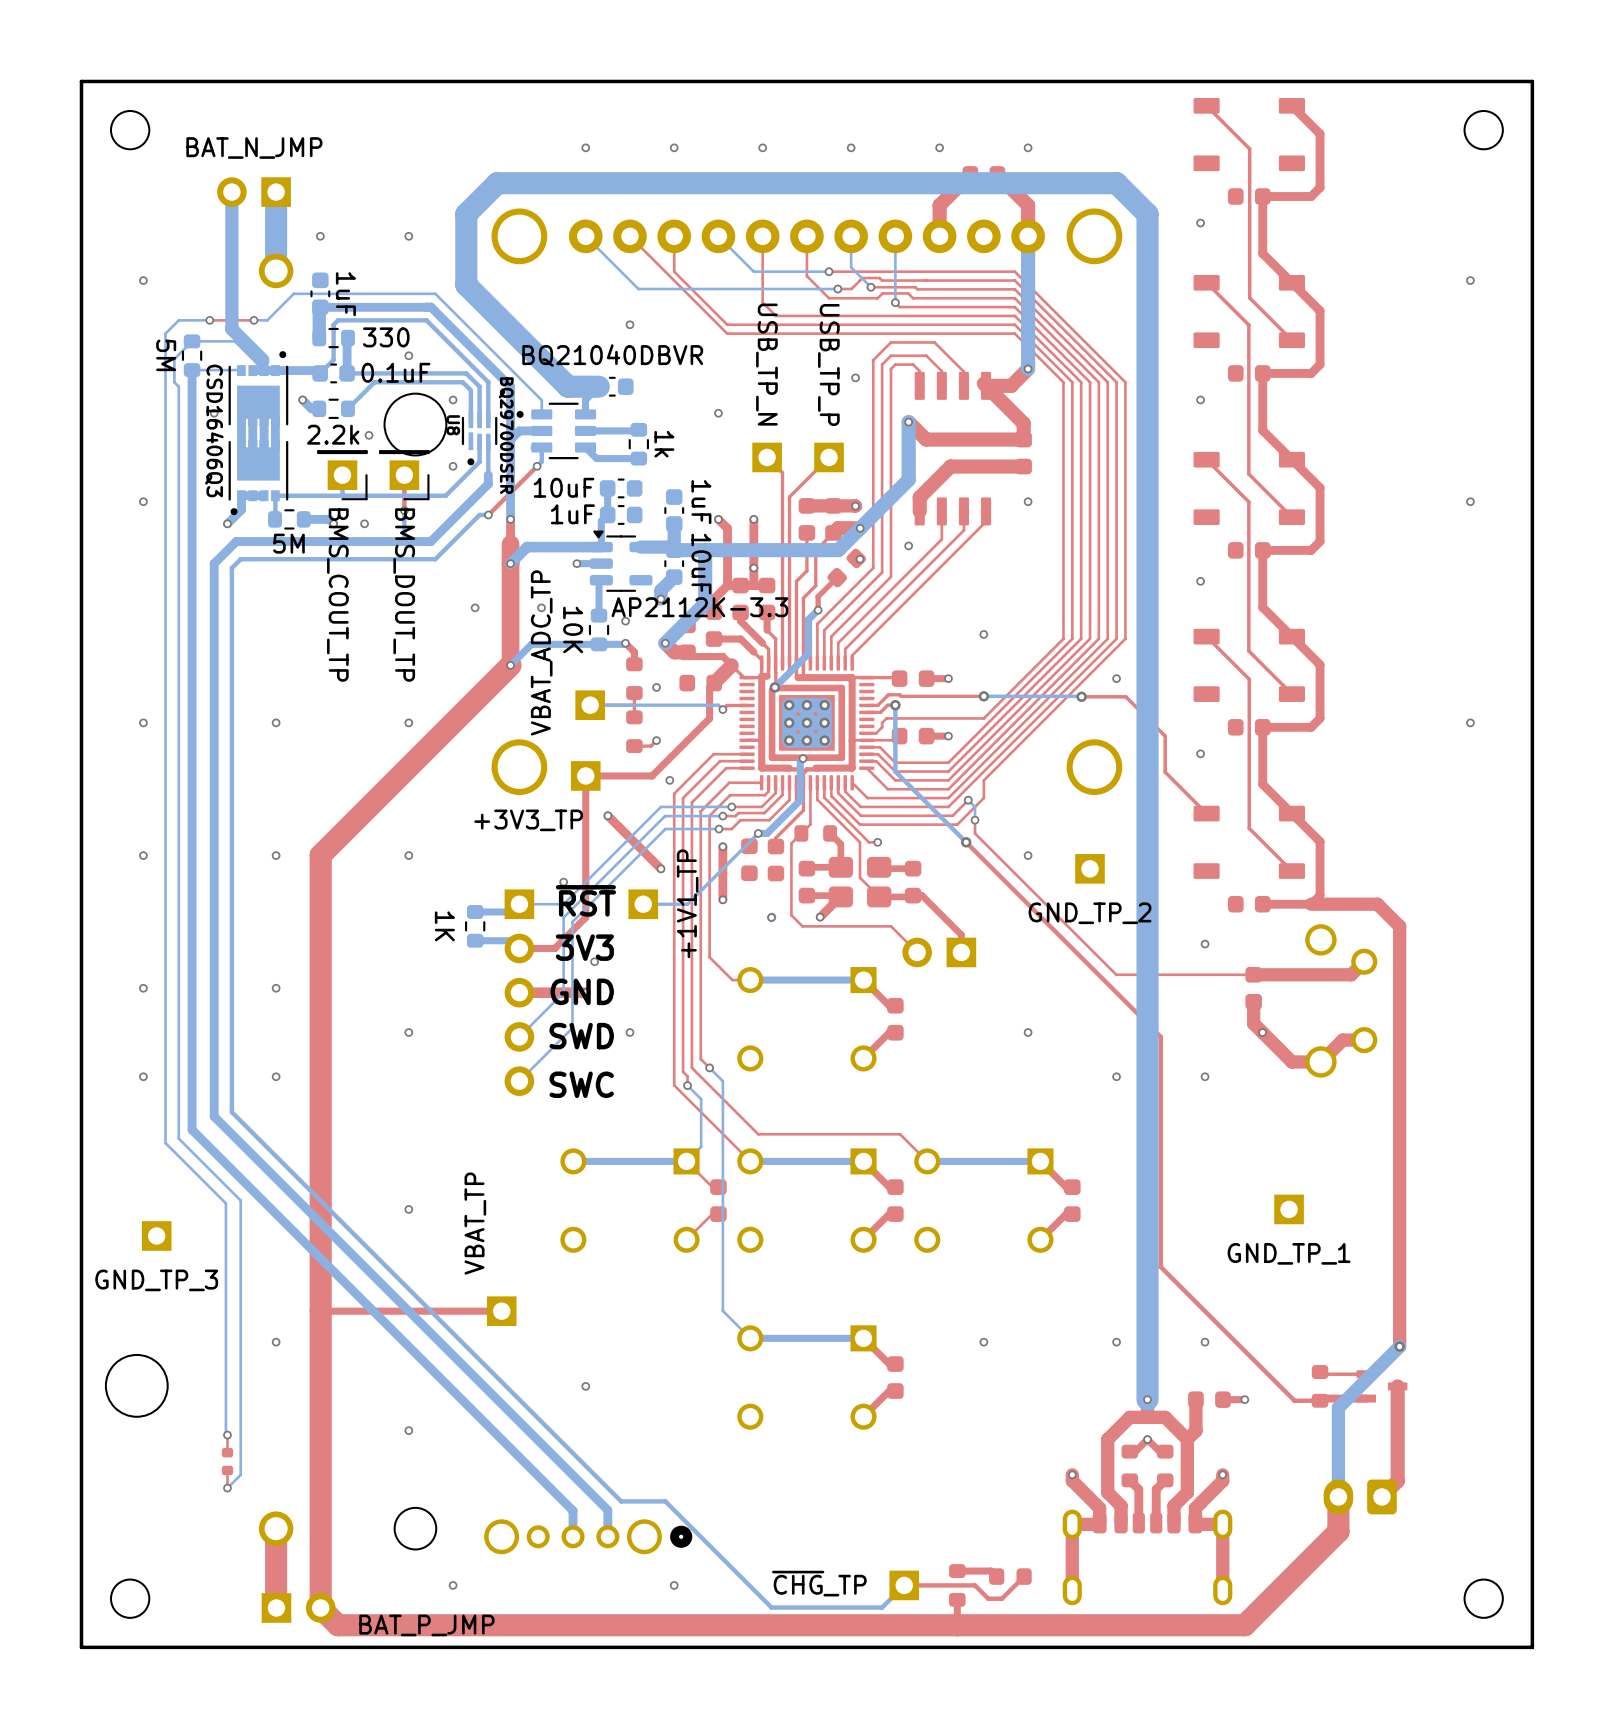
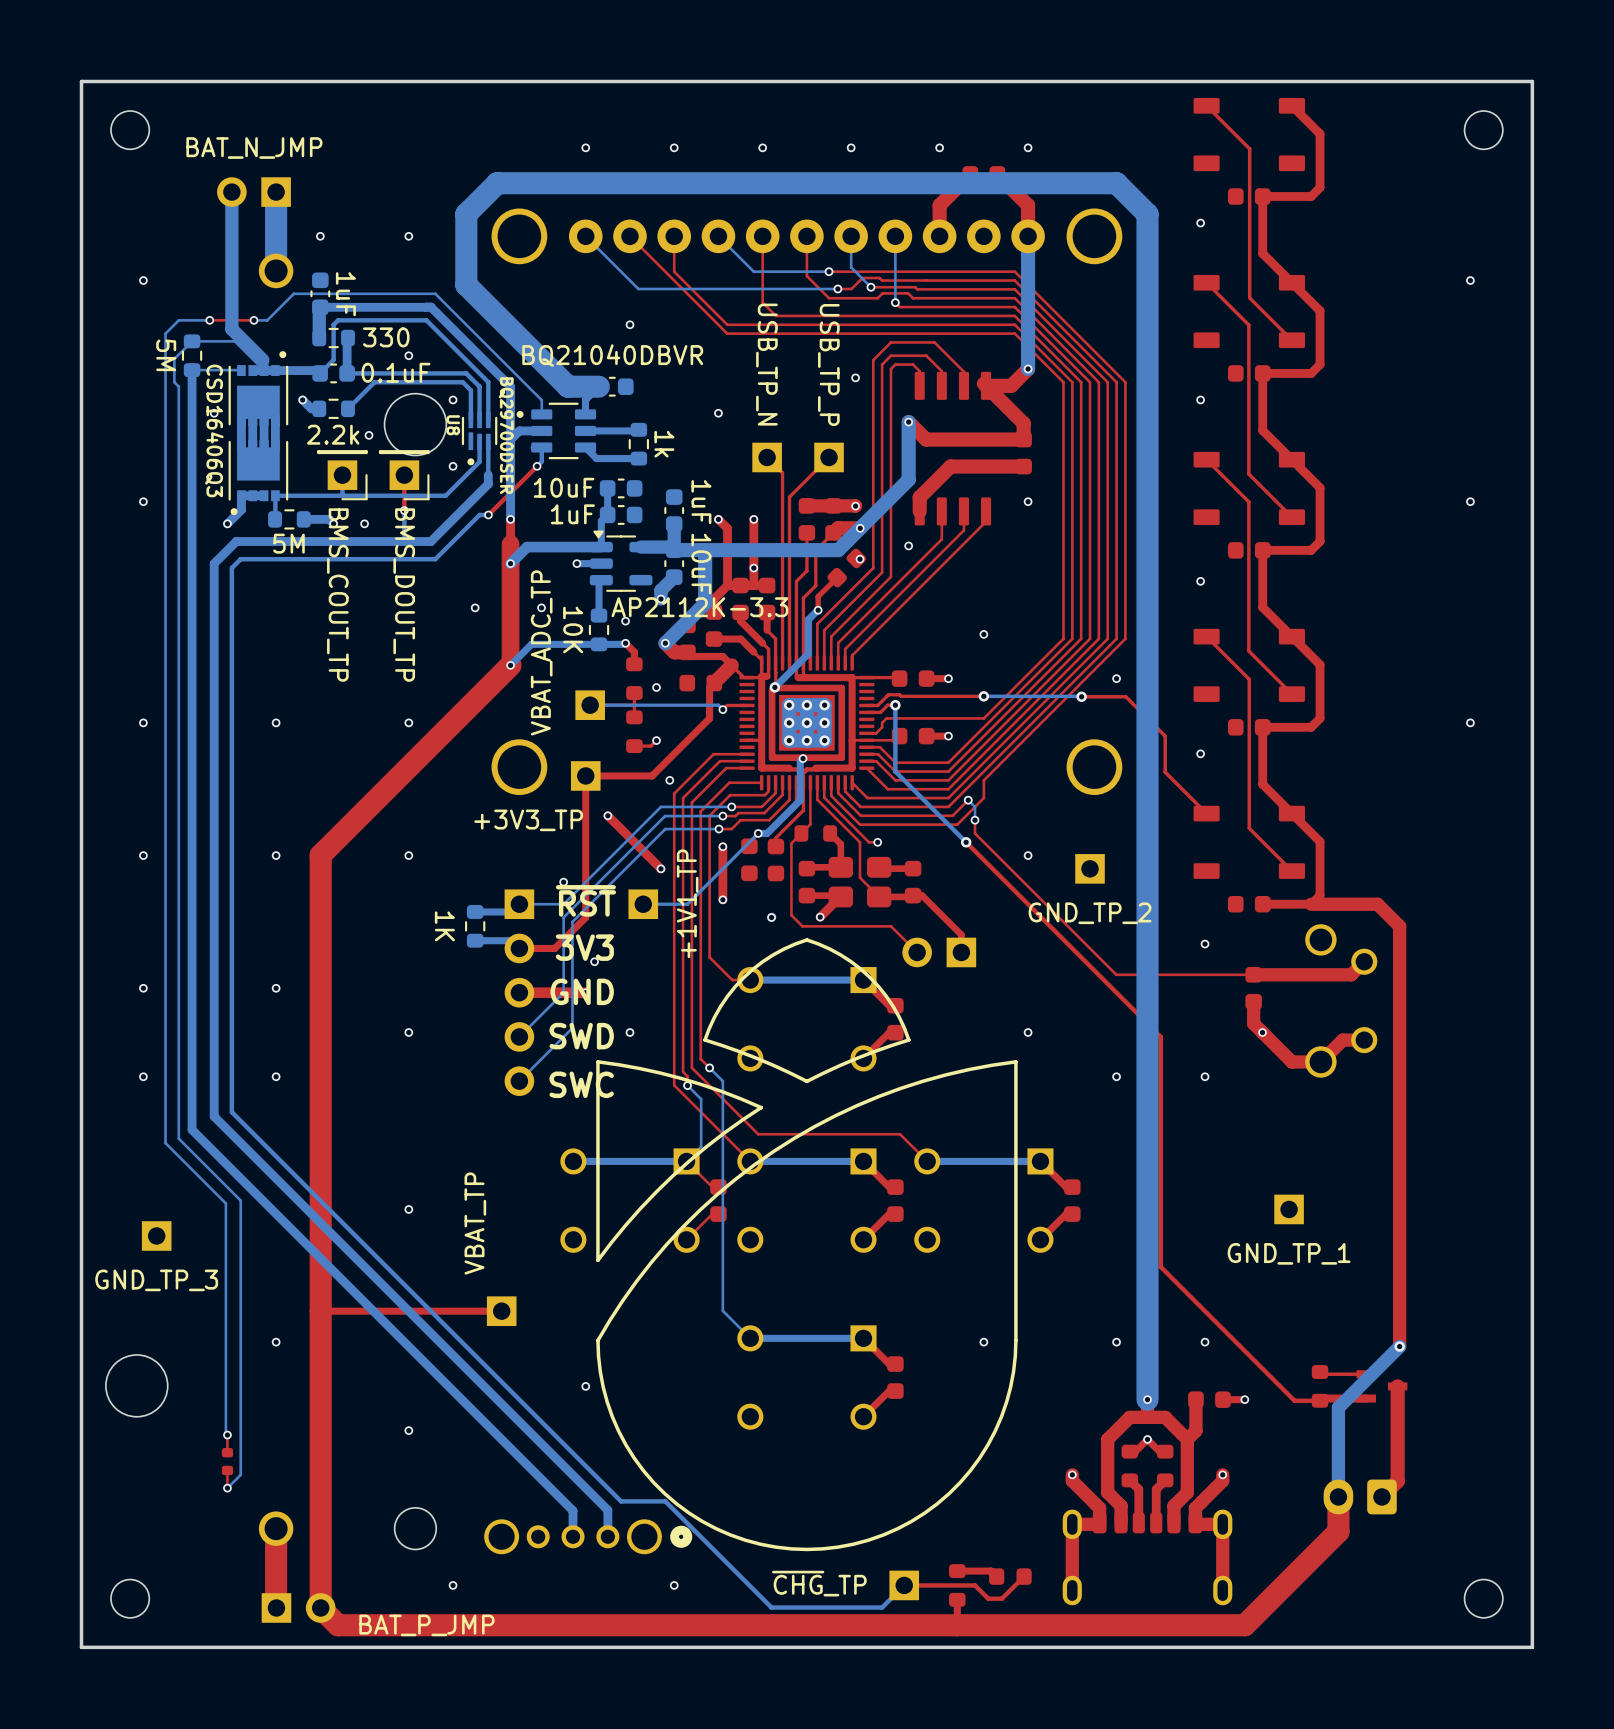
line: none -> (806, 939) (840, 954) (870, 977) (893, 1006) (908, 1040) (856, 1058) (806, 1081) (756, 1058) (704, 1040) (720, 1006) (743, 977) (773, 954) (806, 939)
line: none -> (597, 1061) (597, 1260) (640, 1208) (672, 1176) (724, 1133) (761, 1107) (721, 1091) (681, 1078) (639, 1068) (597, 1061)
line: none -> (1015, 1061) (1015, 1356) (1010, 1386) (1001, 1416) (987, 1444) (970, 1470) (949, 1493) (911, 1521) (868, 1540) (822, 1548) (791, 1548) (745, 1540) (702, 1521) (676, 1503) (653, 1482) (625, 1444) (607, 1402) (600, 1371) (597, 1340) (636, 1281) (666, 1244) (699, 1210) (735, 1179) (793, 1138) (856, 1105) (900, 1088) (969, 1069) (1015, 1061)

